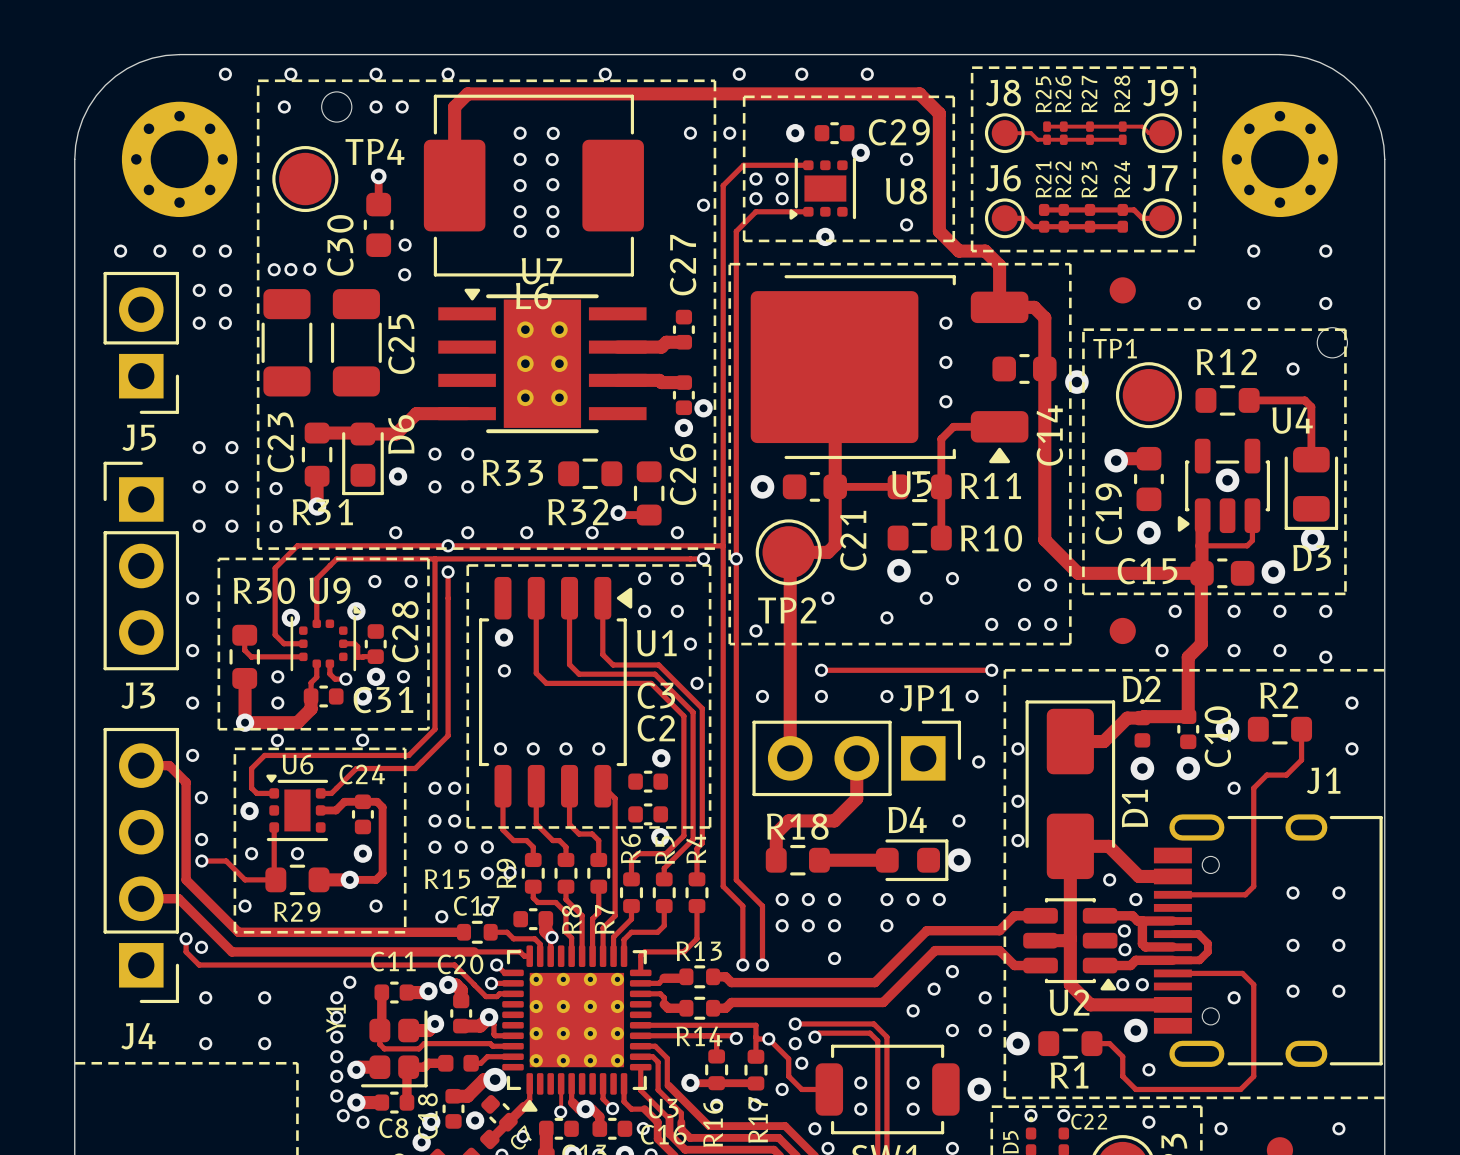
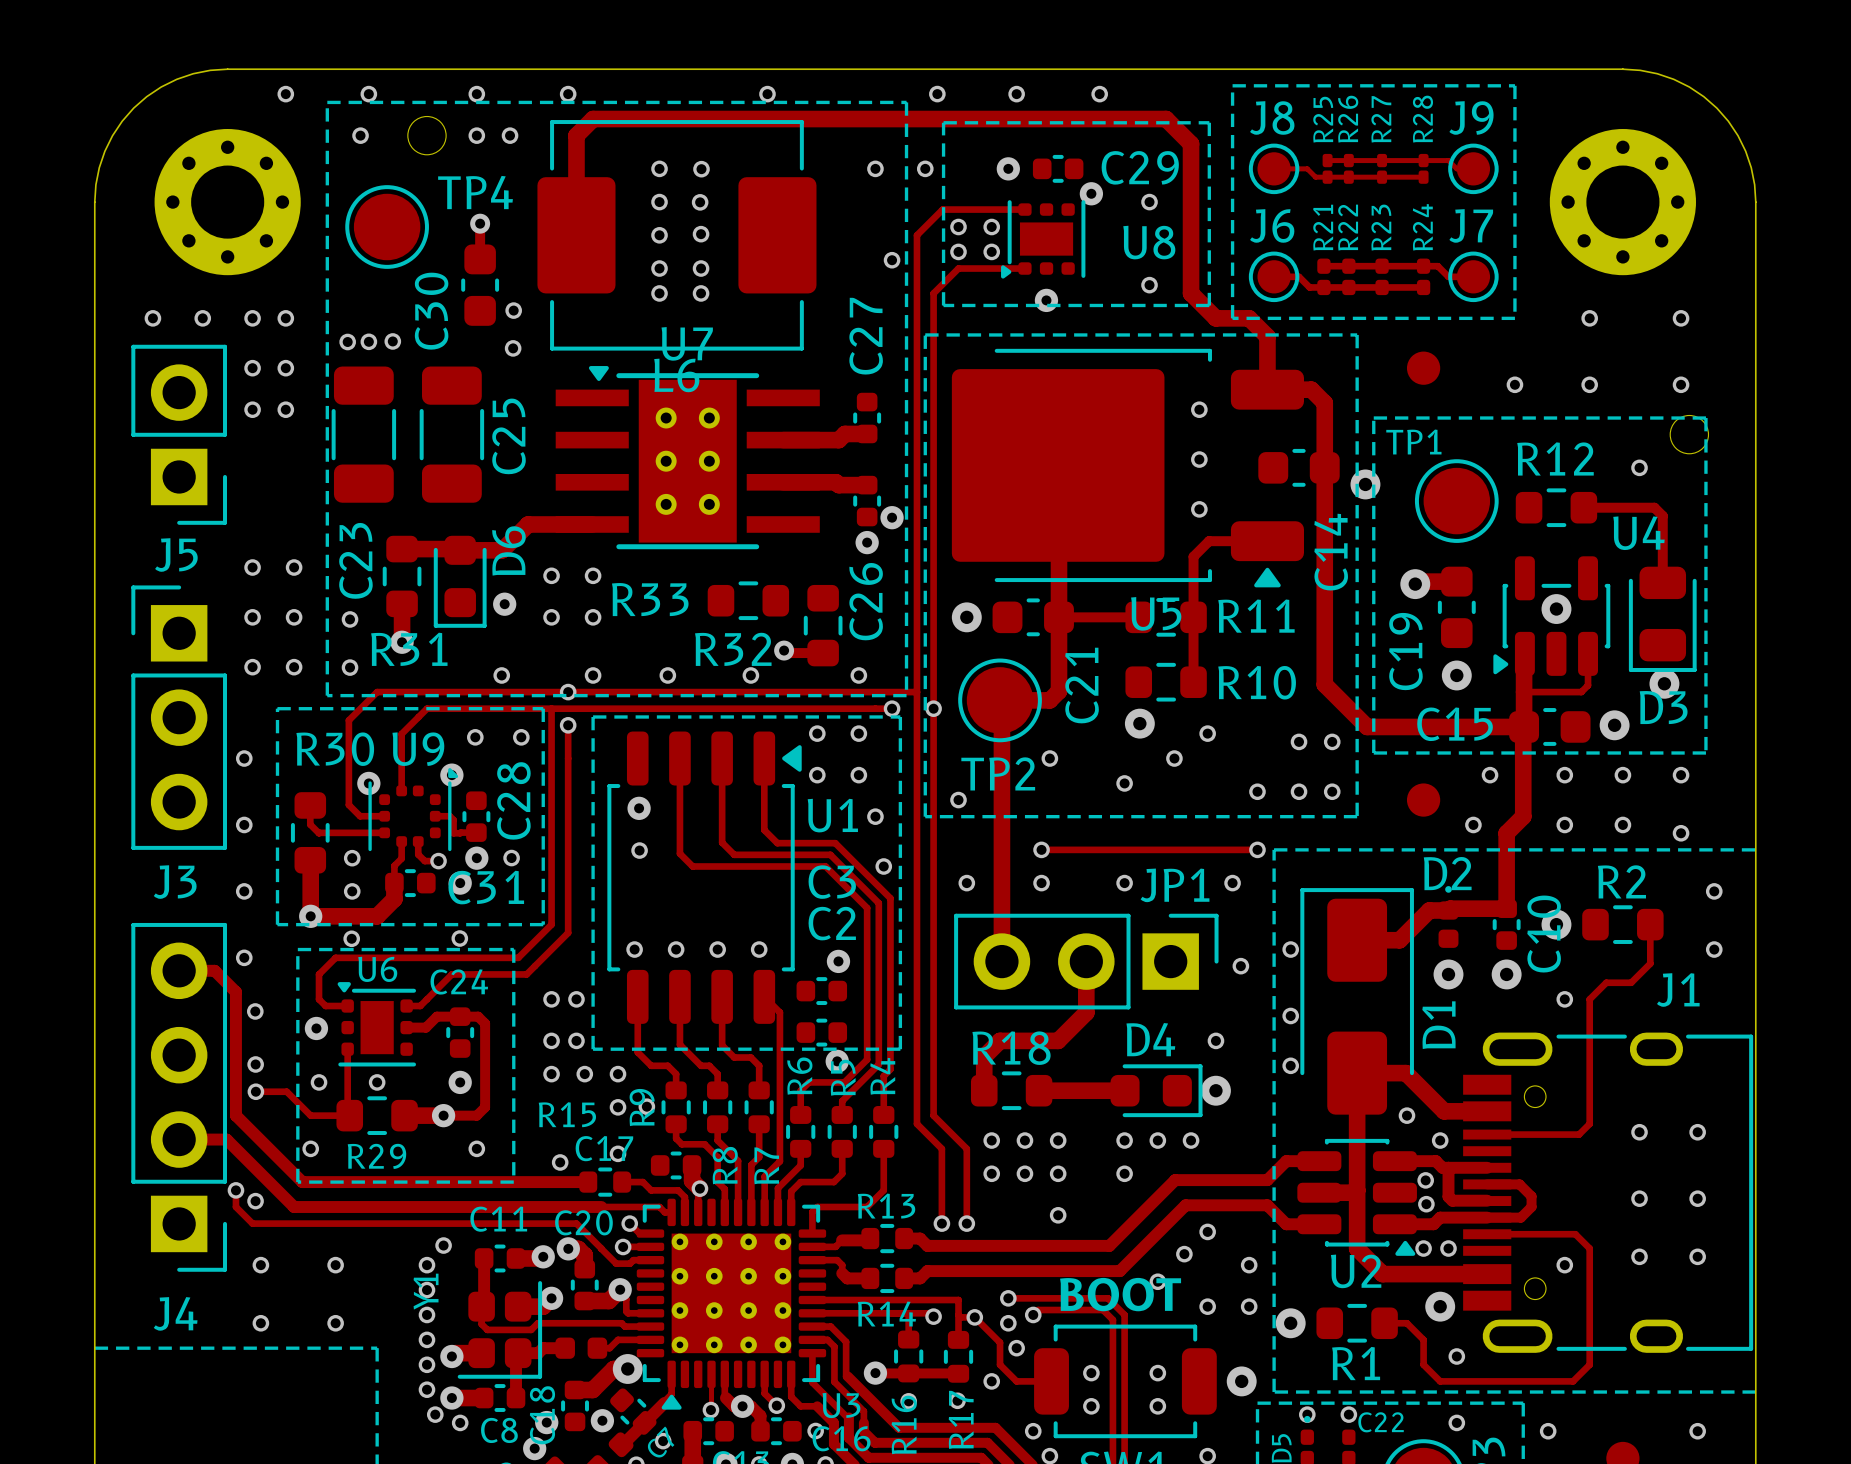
text: none -> BOOT (1120, 1294)

